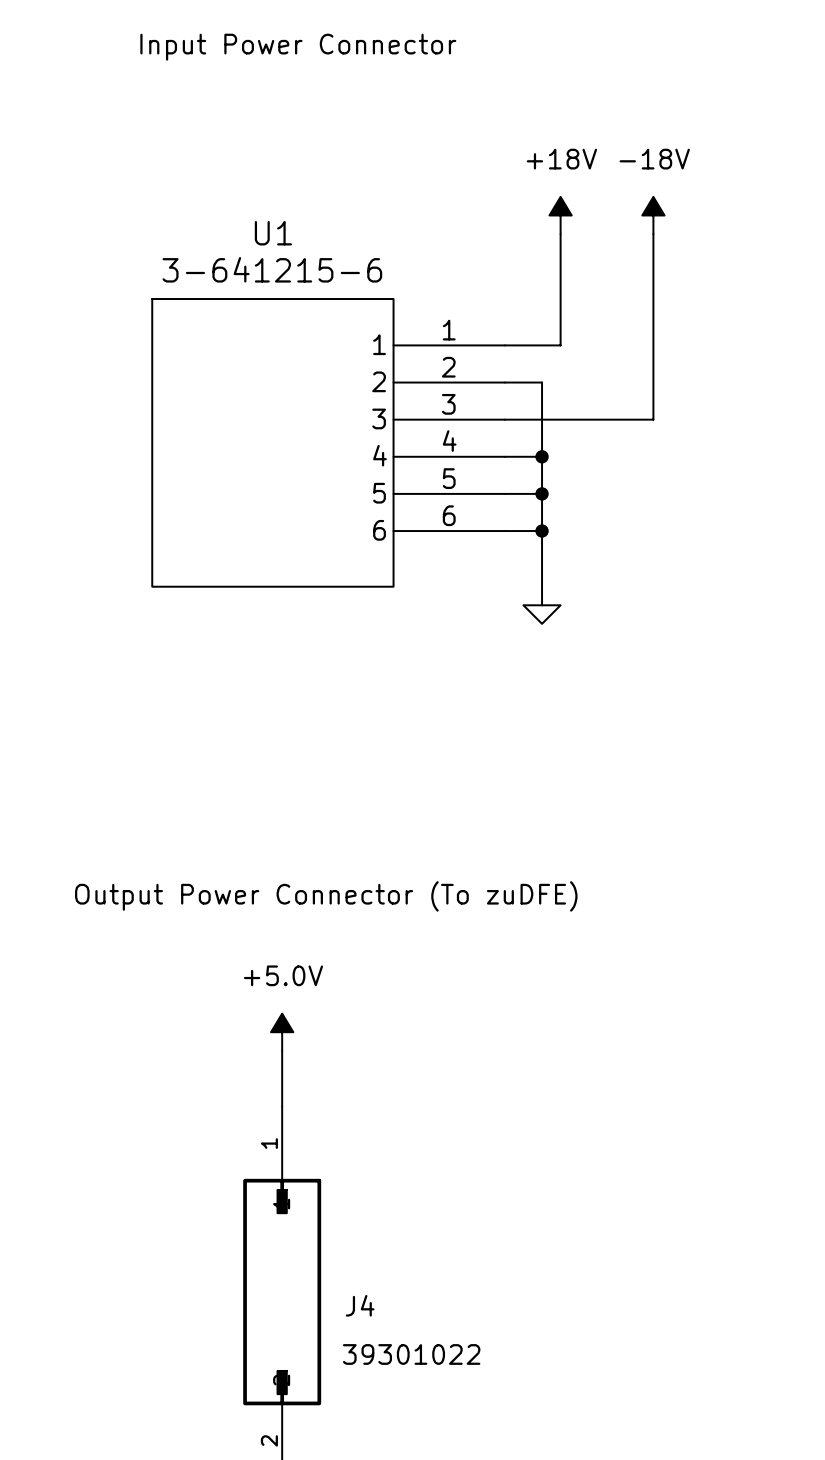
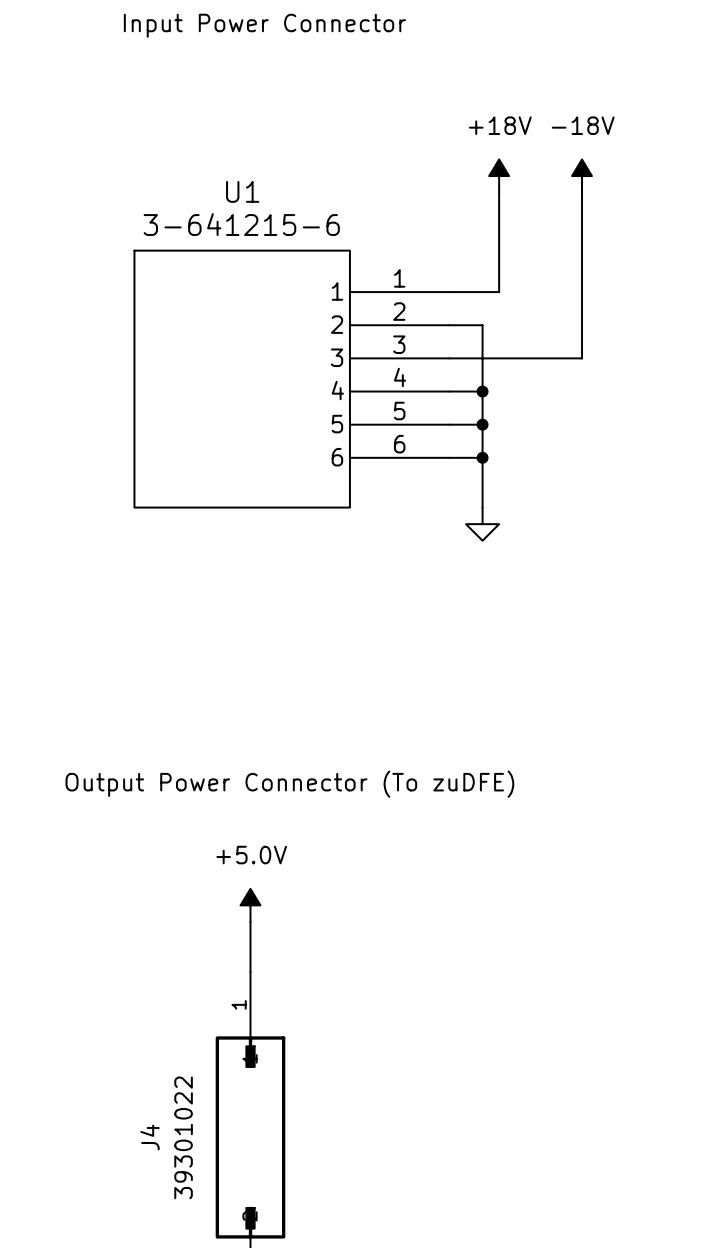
J4 name rotation: 0° (360, 1305) -> 90° counterclockwise (150, 1137)
J4 name position: J4 (360, 1305) -> J4 (150, 1137)
J4 value rotation: 0° (411, 1354) -> 90° counterclockwise (183, 1137)
J4 value position: 39301022 (411, 1354) -> 39301022 (183, 1137)

